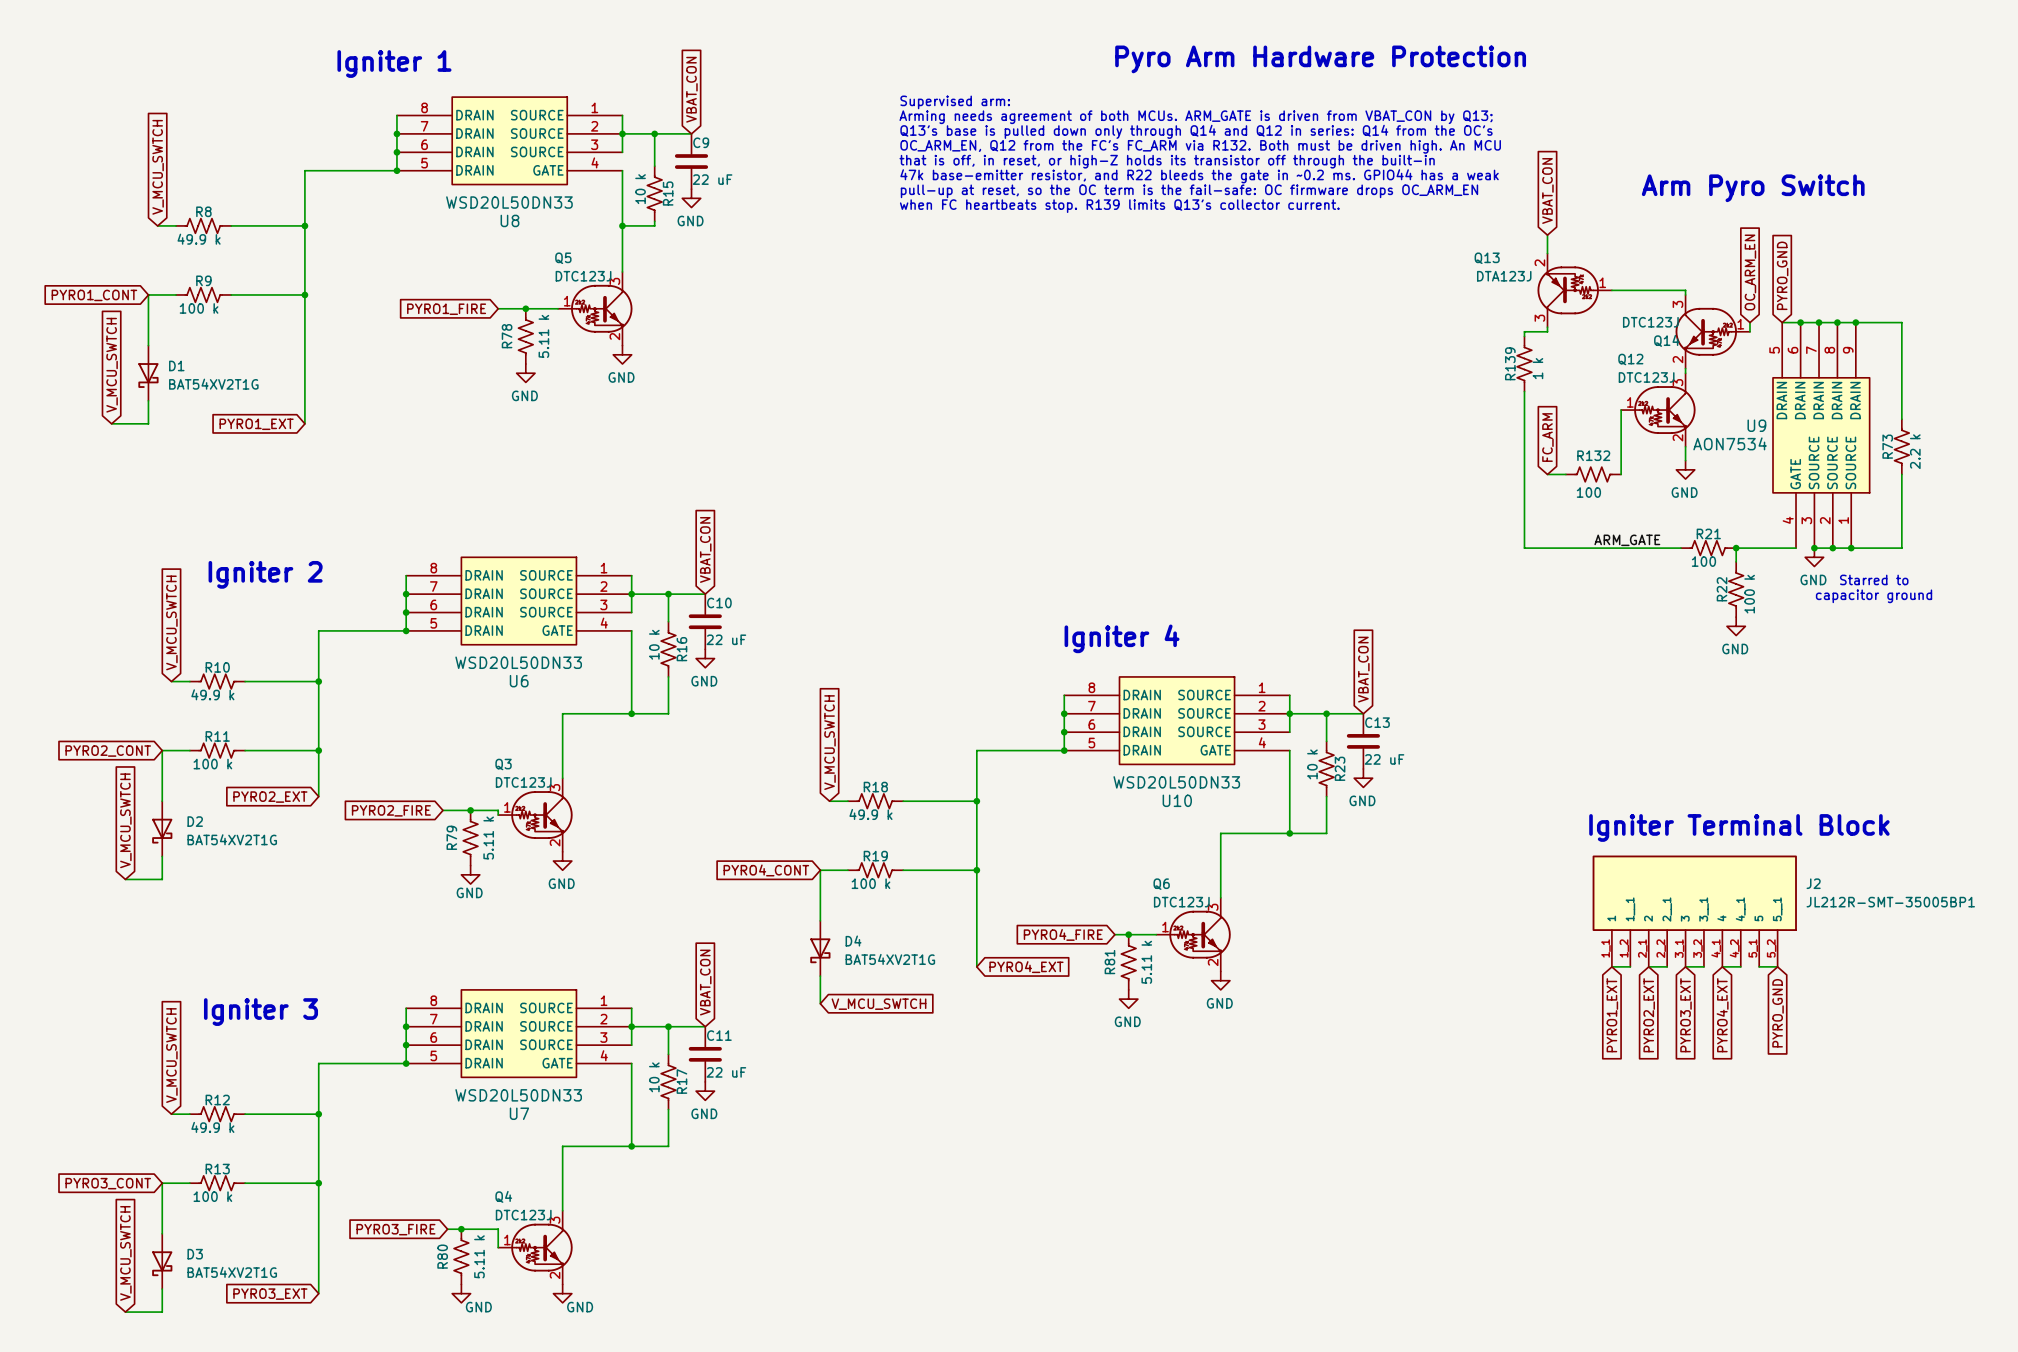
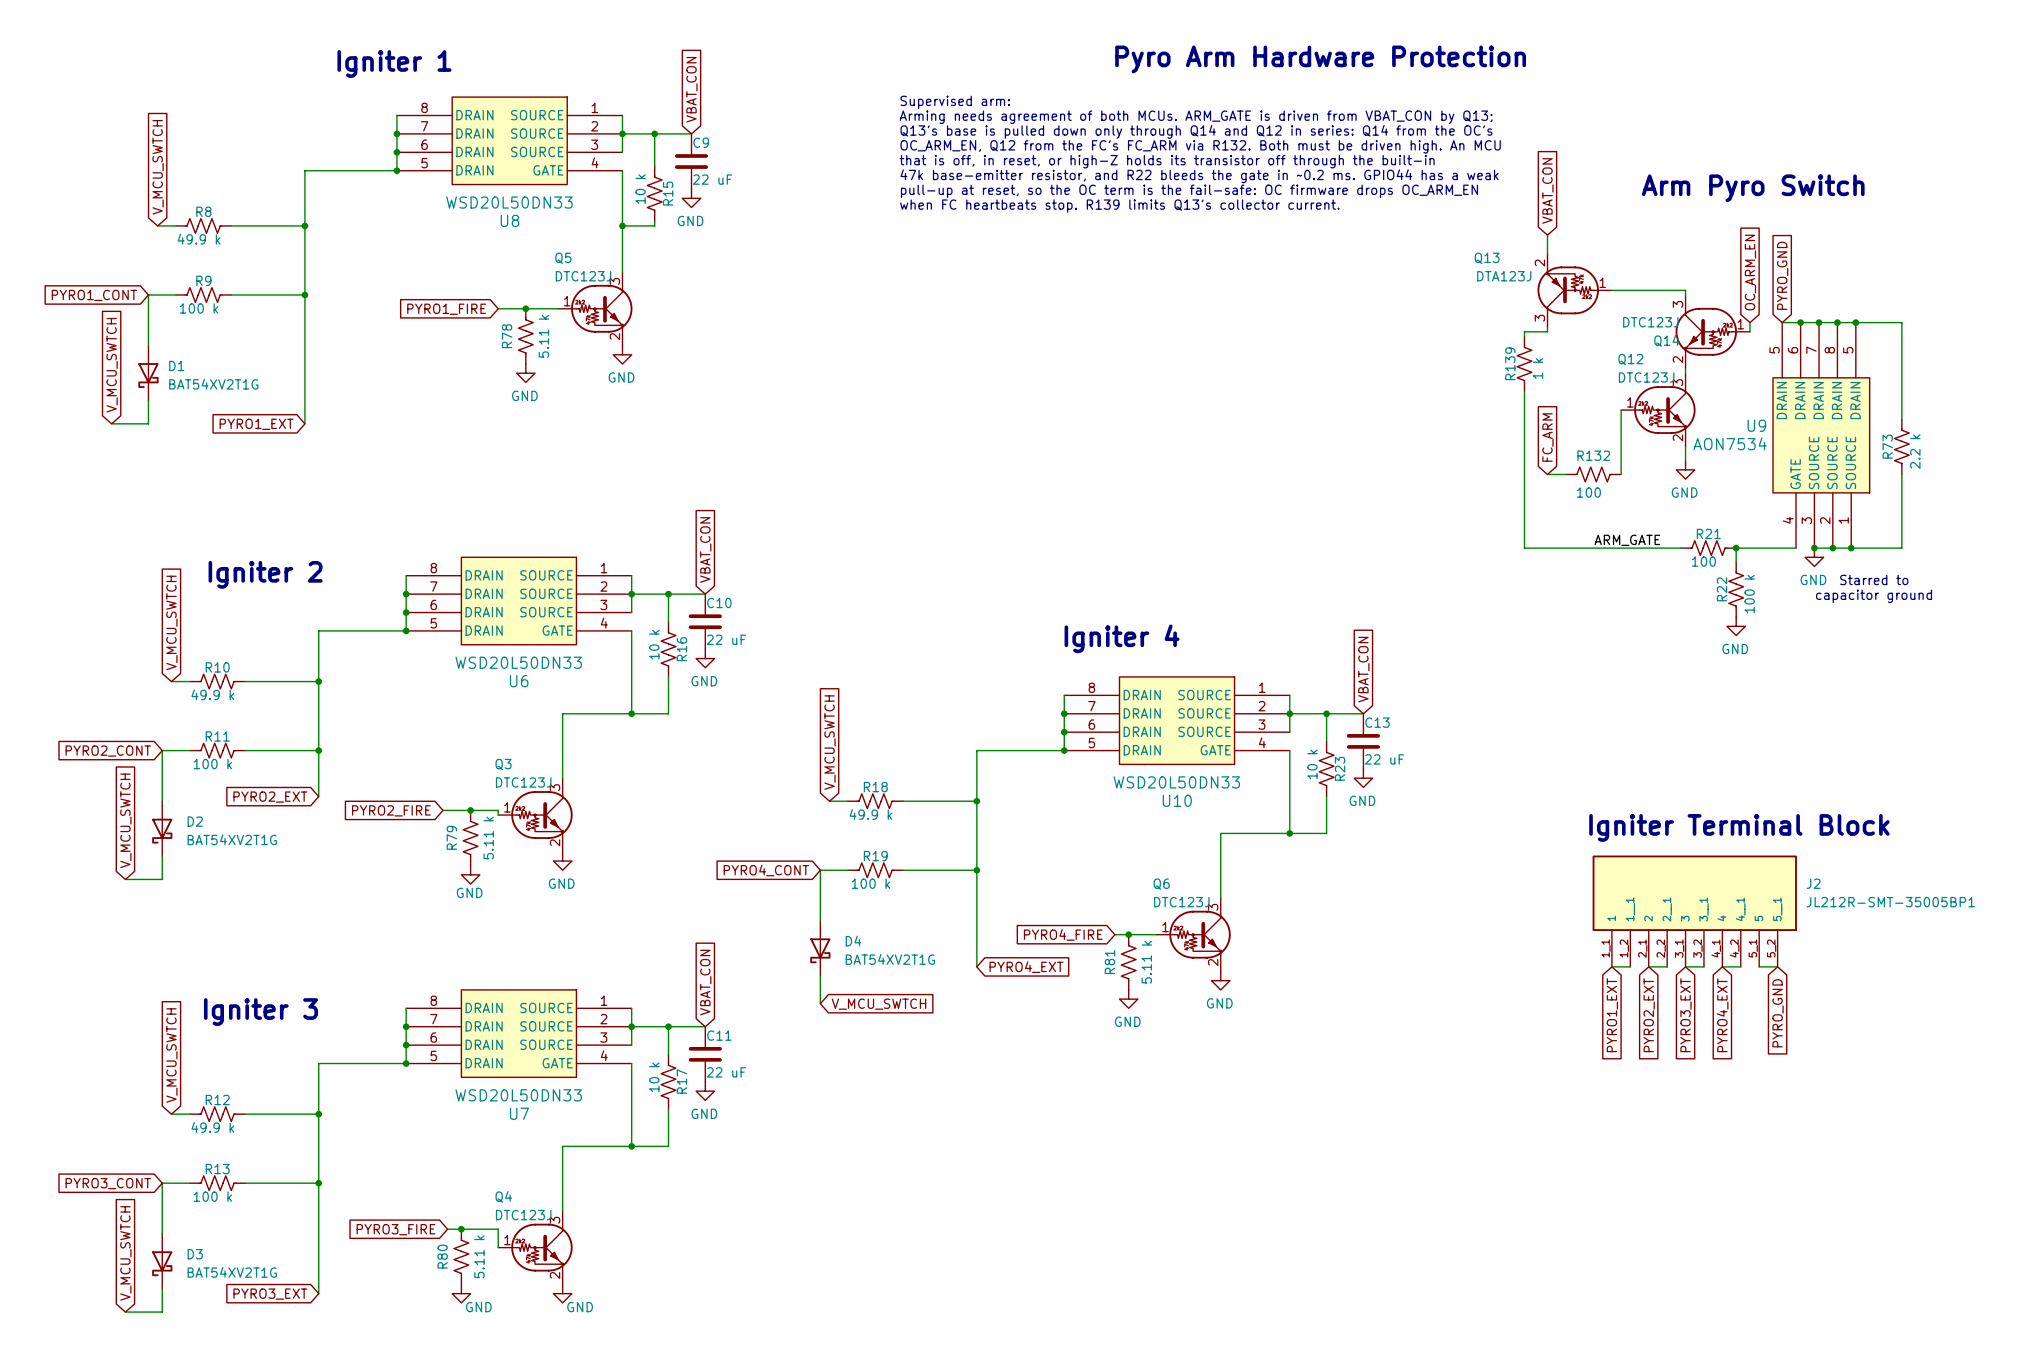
U9 pin number: 9 (1848, 350) -> 5 (1848, 350)

